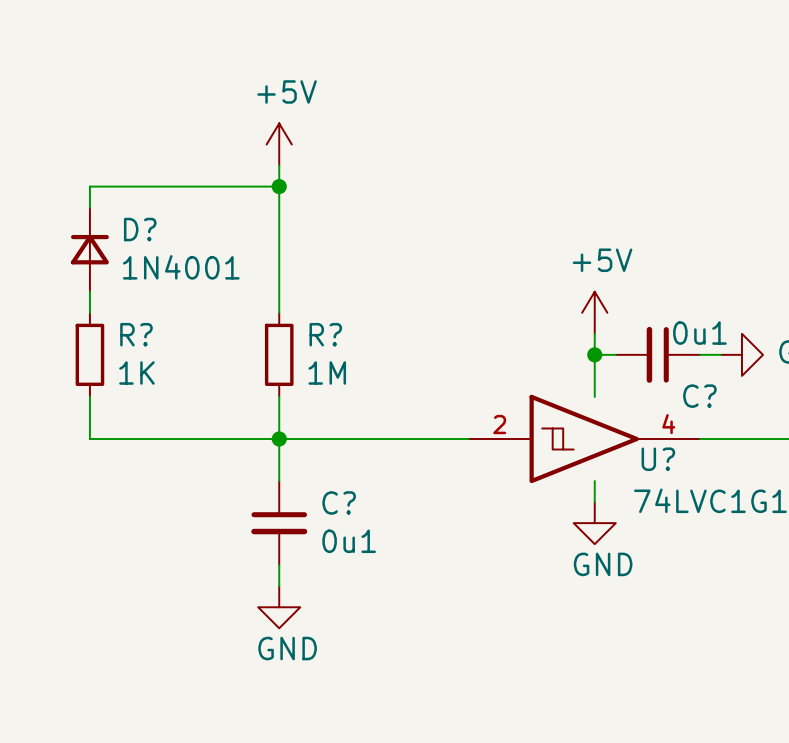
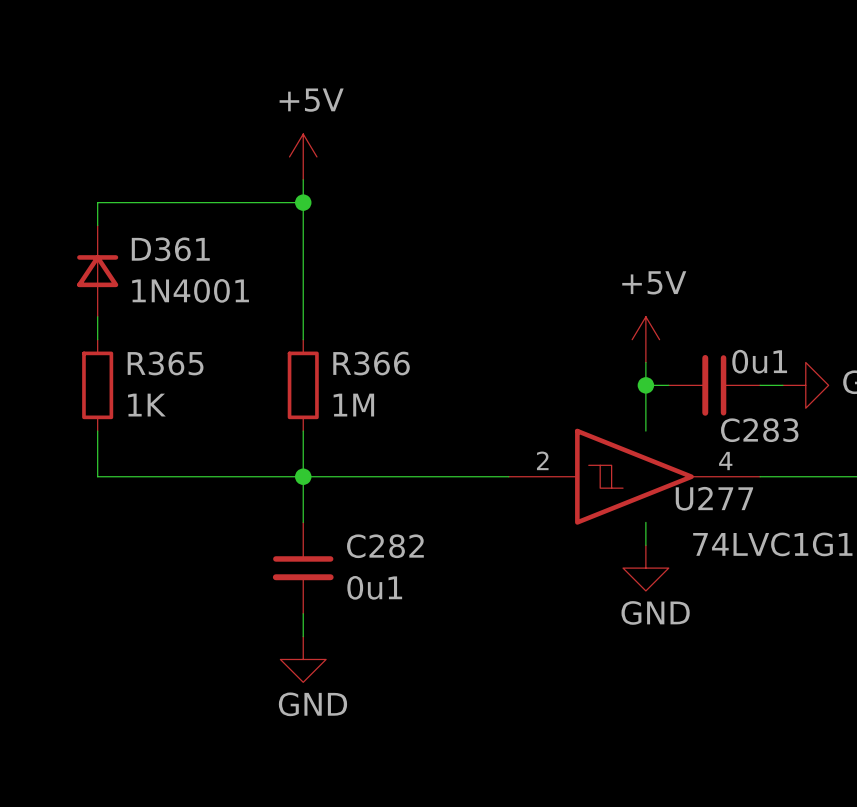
D? name: D? (140, 229) -> D361 (170, 249)
R? name: R? (136, 334) -> R365 (165, 363)
R? name: R? (325, 334) -> R366 (371, 363)
C? name: C? (699, 396) -> C283 (759, 430)
U? name: U? (658, 459) -> U277 (714, 498)
C? name: C? (339, 502) -> C282 (385, 546)

